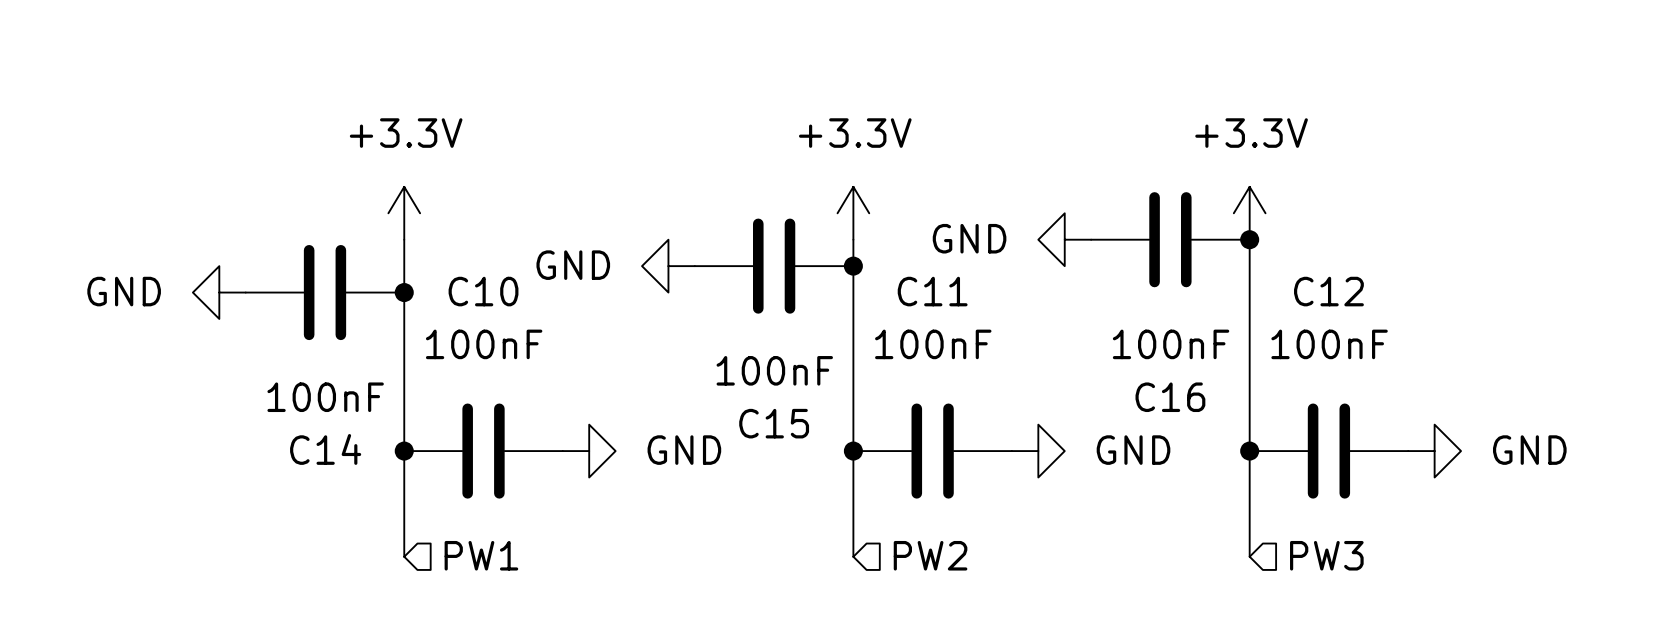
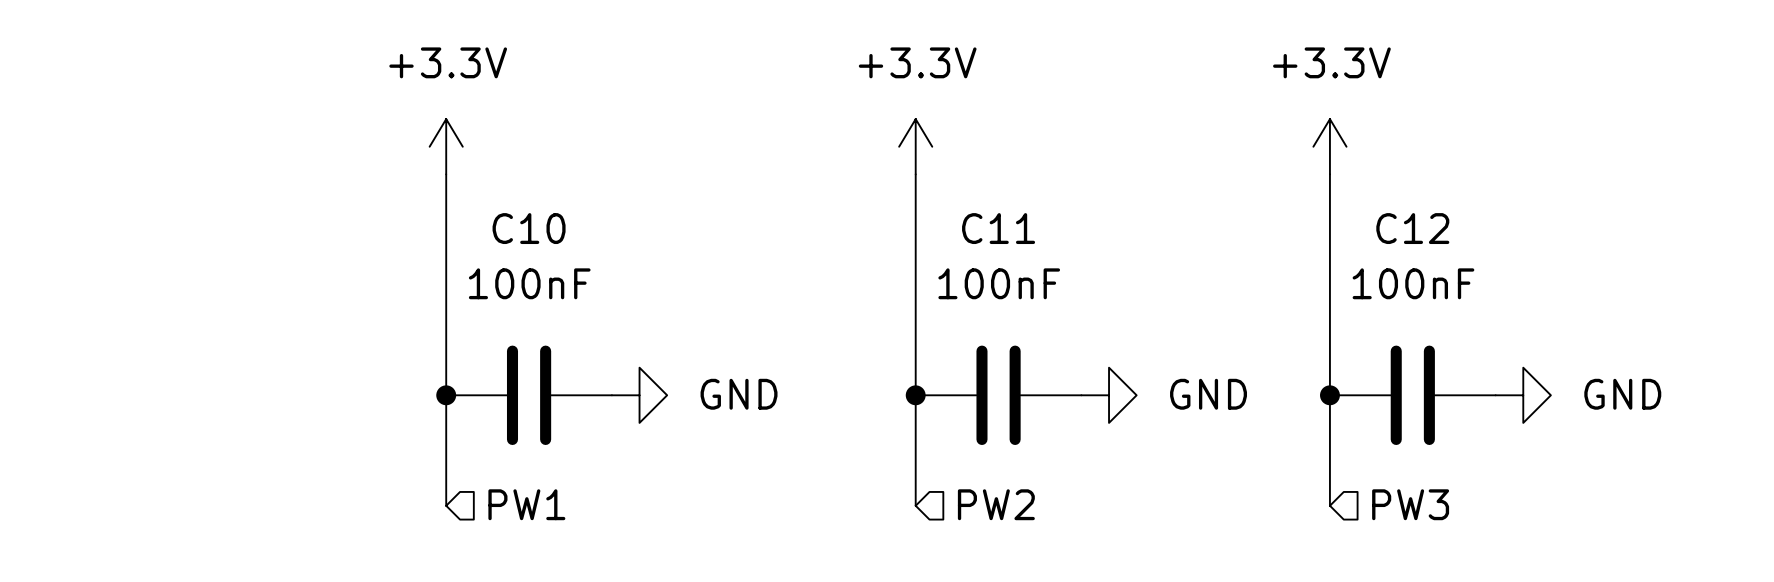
power symbol: GND (1064, 239) -> none
C16: 100nF (1170, 239) -> none
junction: (1249, 239) -> none
power symbol: GND (668, 266) -> none
C15: 100nF (774, 266) -> none
junction: (853, 266) -> none
power symbol: GND (219, 292) -> none
C14: 100nF (325, 292) -> none
junction: (404, 292) -> none

